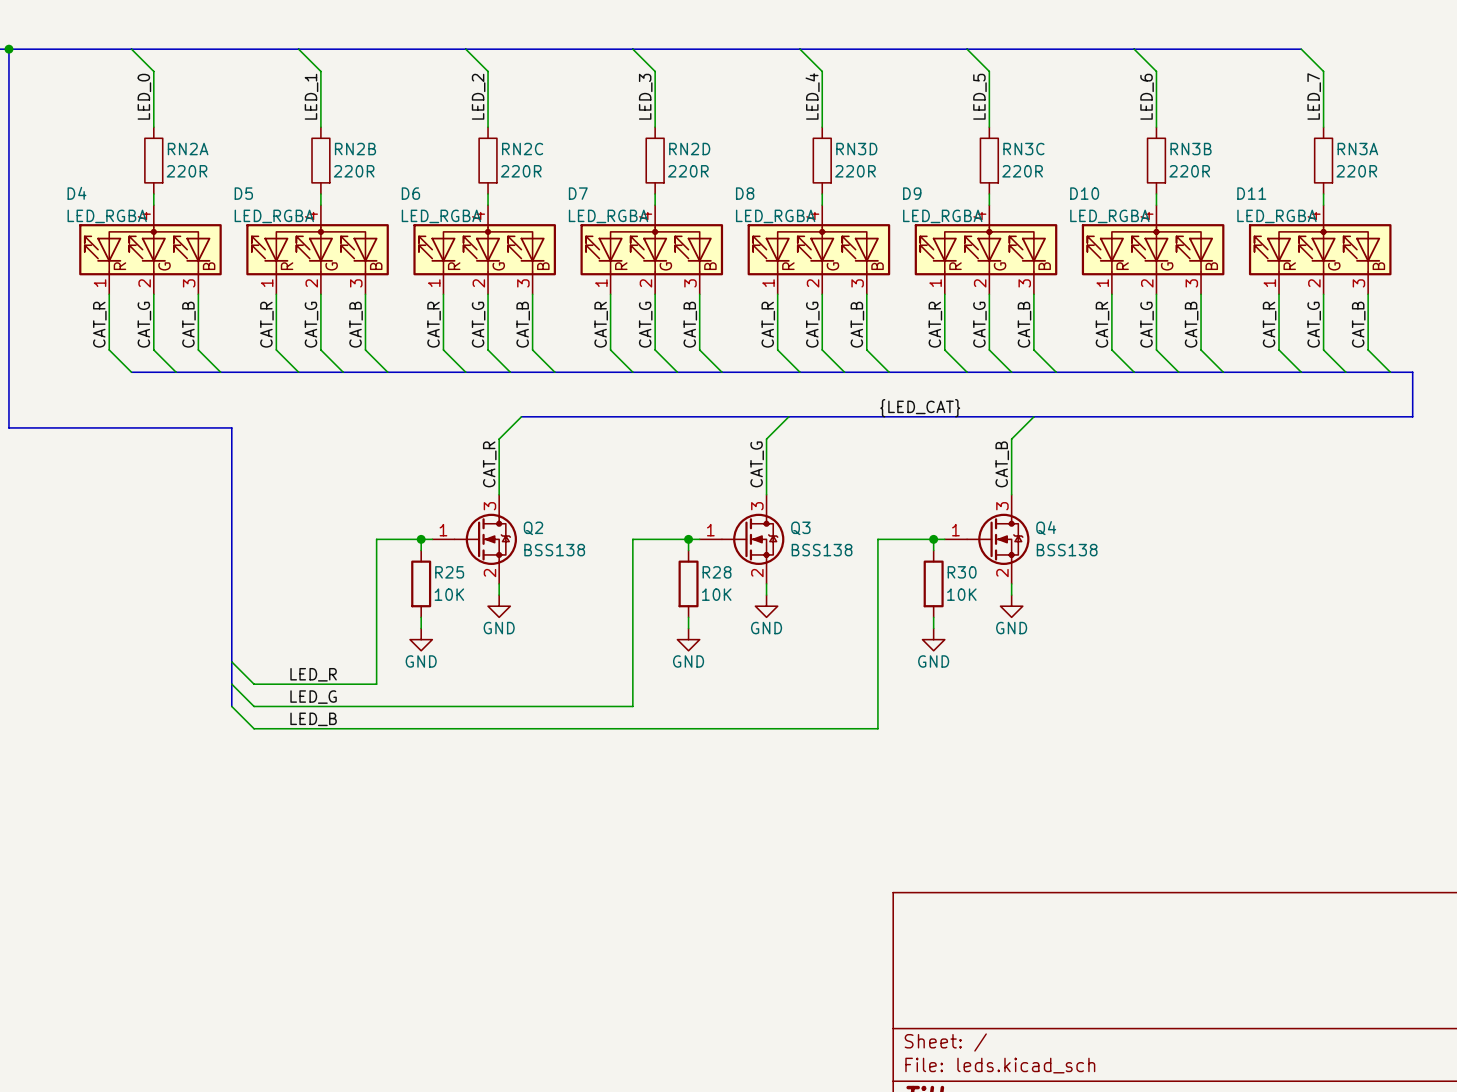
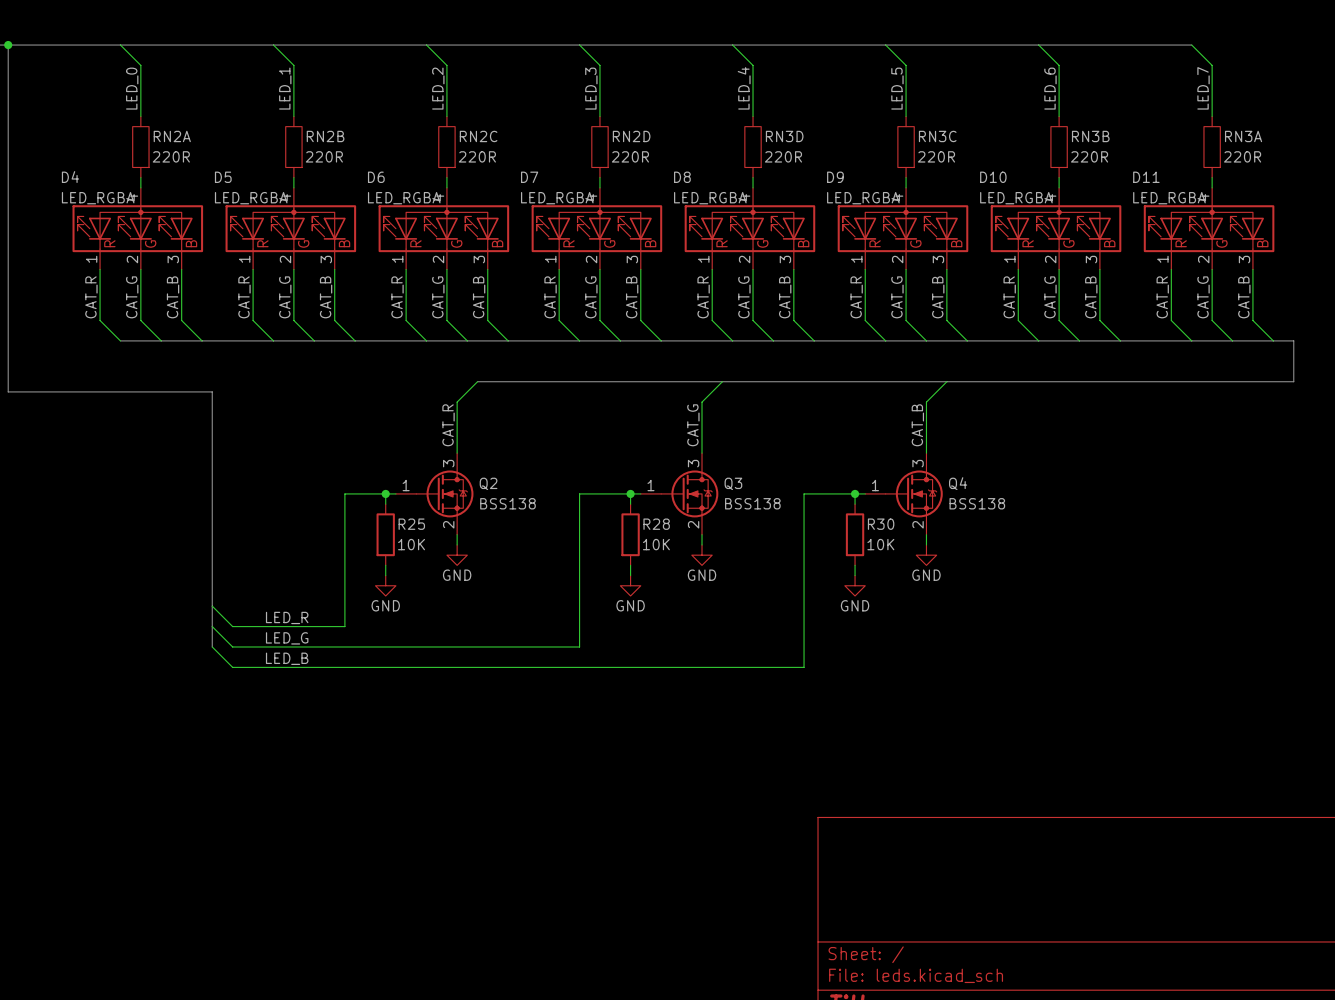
label: {LED_CAT} (920, 408) -> none

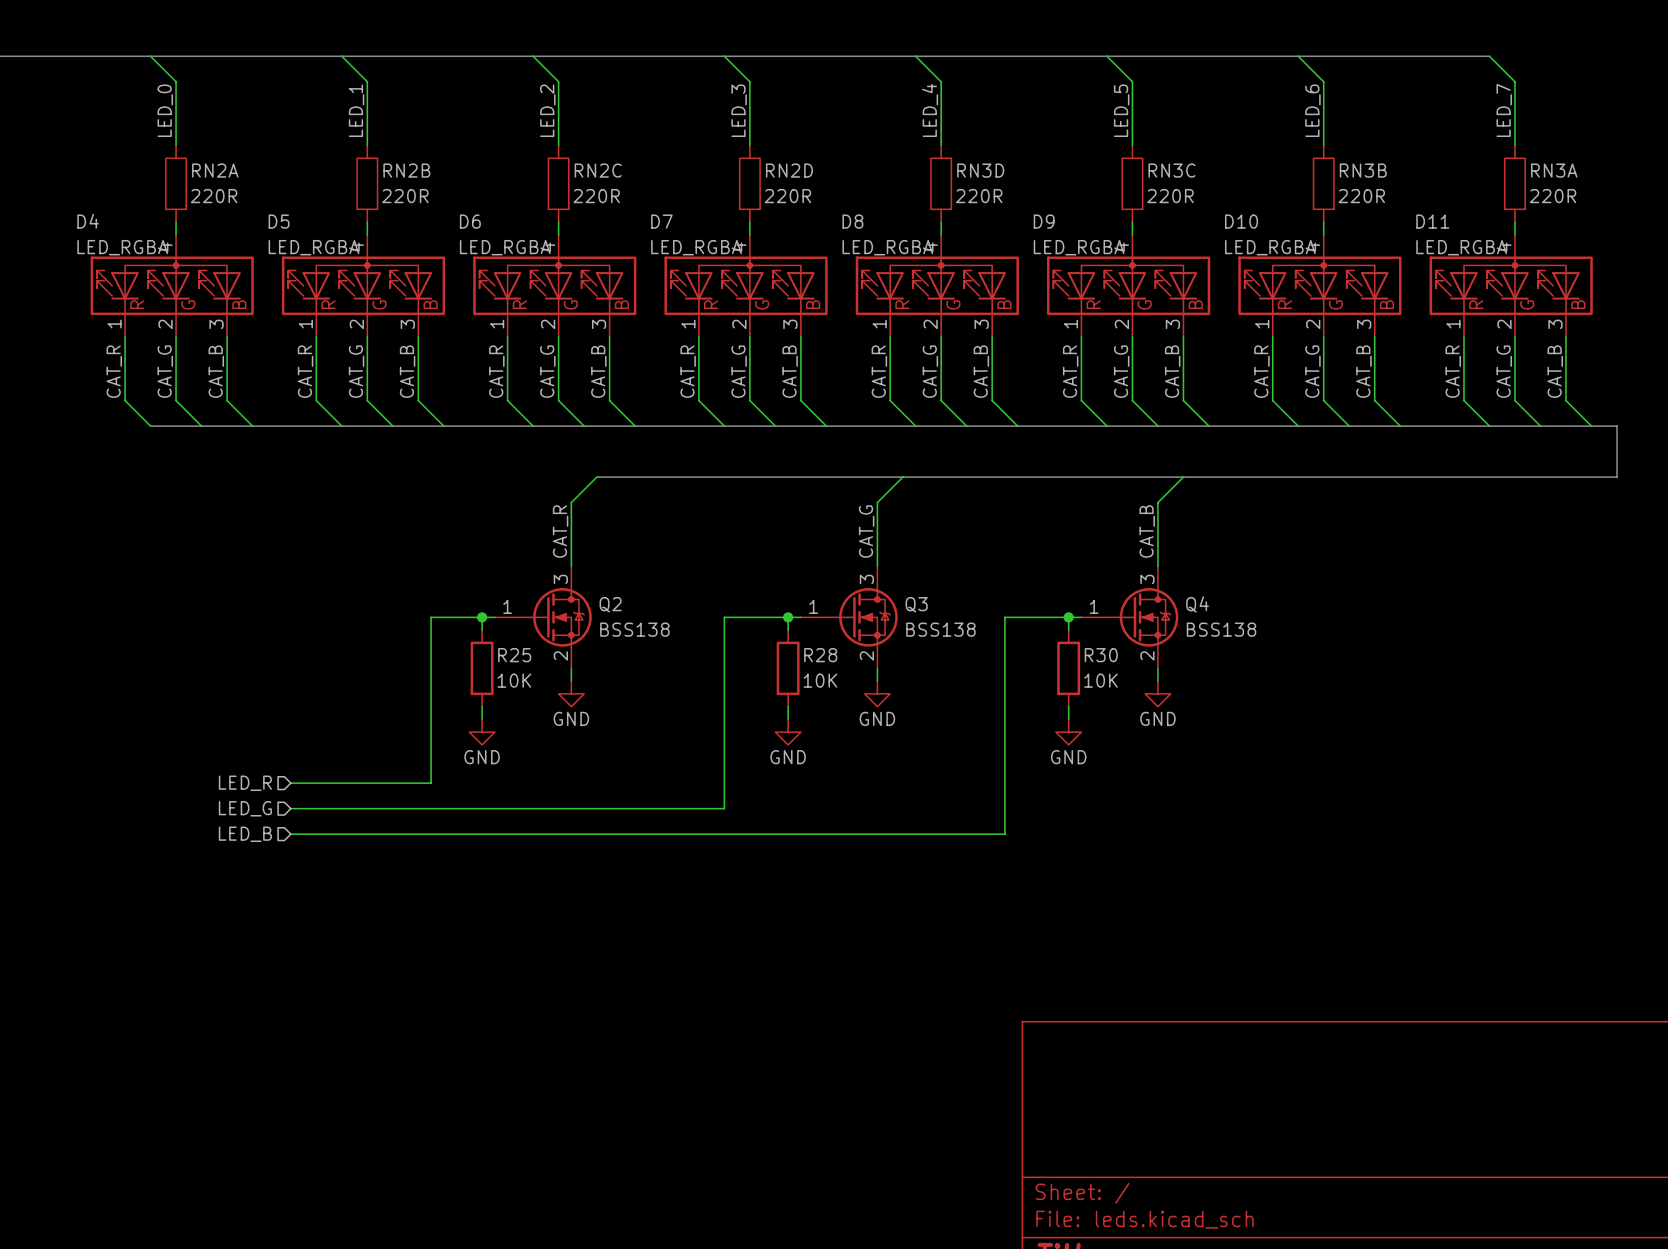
bus: (8, 45) (8, 391) (212, 391) (212, 646) -> none
junction: (8, 45) -> none
wire: (212, 606) (232, 626) -> none
label: LED_R (287, 617) -> none
hierarchical label: none -> LED_R (245, 783)
wire: (212, 626) (232, 646) -> none
label: LED_G (287, 638) -> none
wire: (212, 646) (232, 667) -> none
hierarchical label: none -> LED_G (245, 808)
label: LED_B (287, 658) -> none
hierarchical label: none -> LED_B (245, 834)

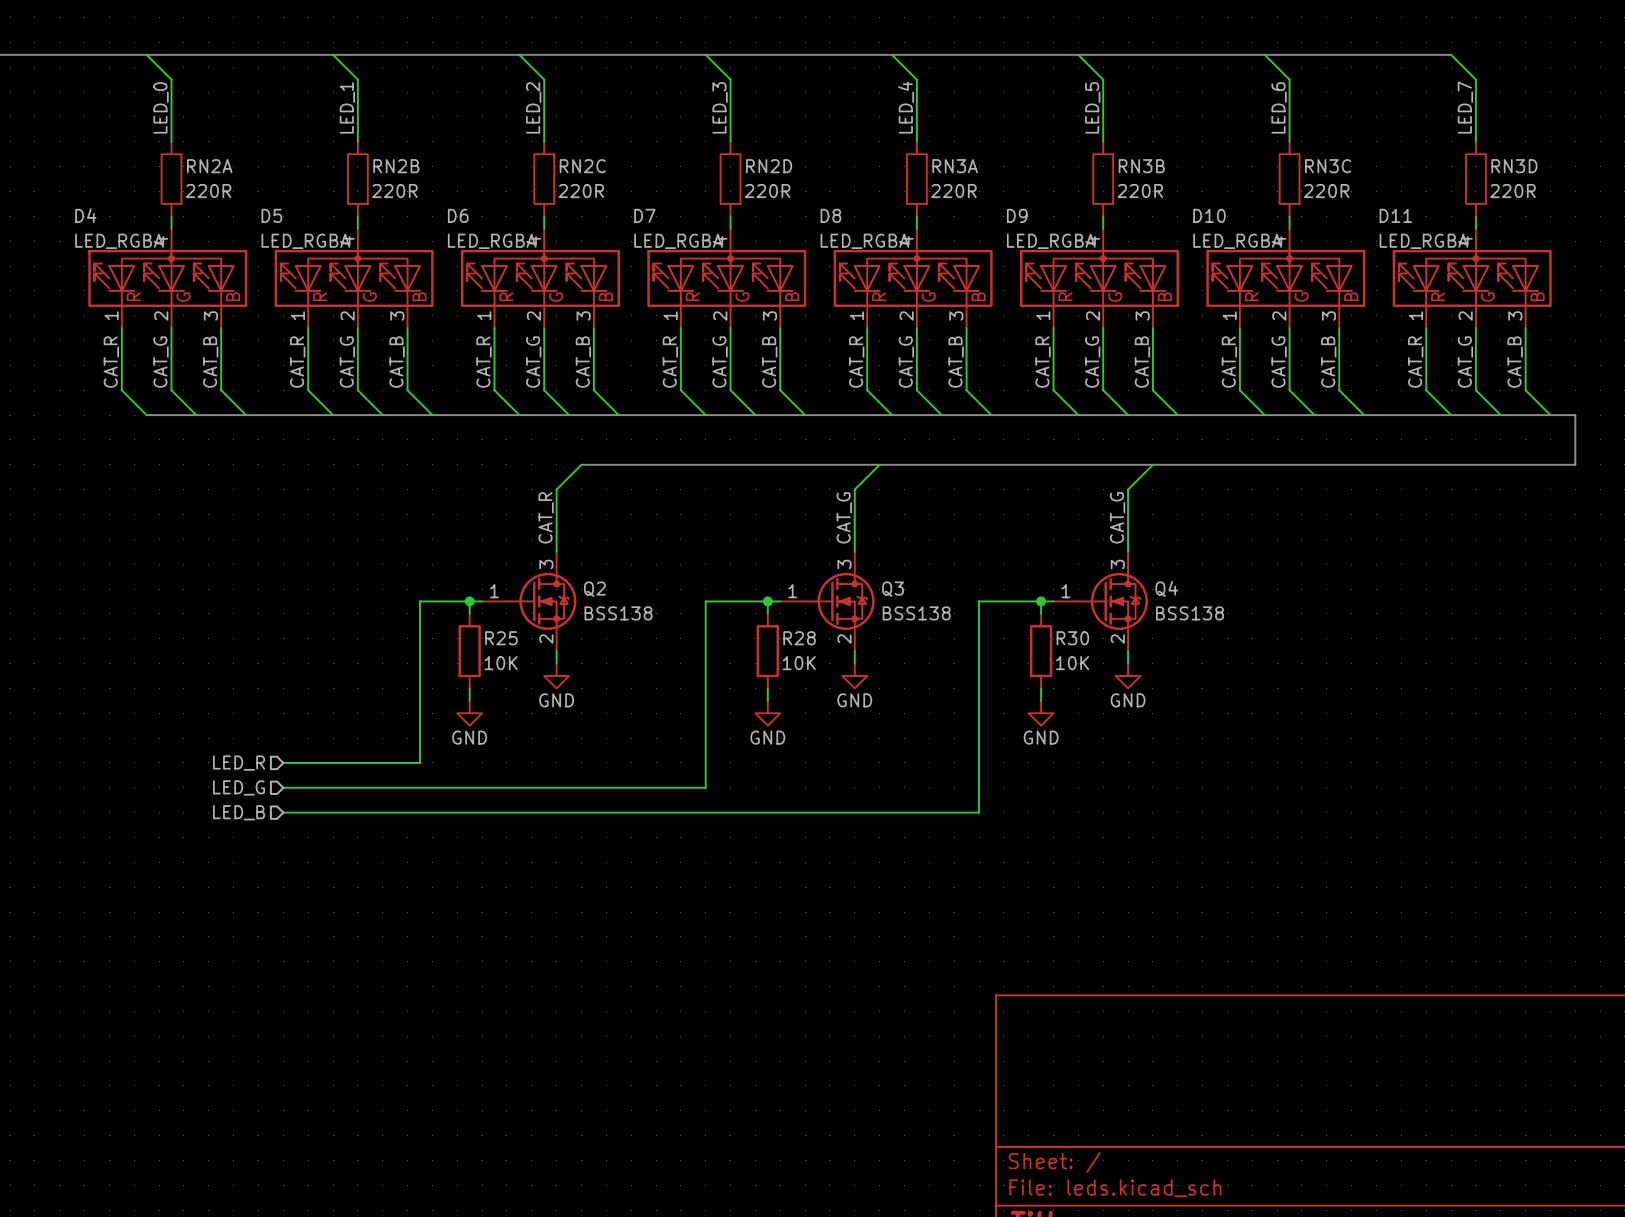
RN3D name: RN3D (980, 170) -> RN3A (955, 166)
RN3C name: RN3C (1172, 170) -> RN3B (1141, 166)
RN3B name: RN3B (1363, 170) -> RN3C (1328, 166)
RN3A name: RN3A (1554, 170) -> RN3D (1514, 166)
label: CAT_B (1147, 531) -> CAT_G (1117, 517)

